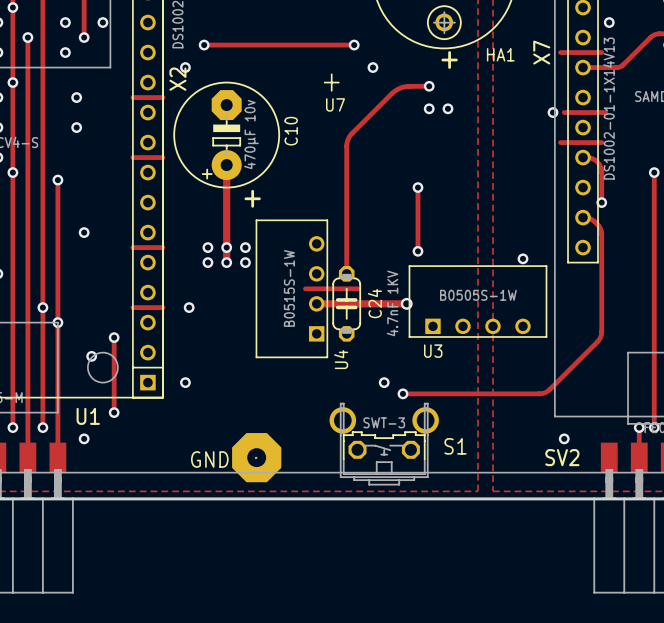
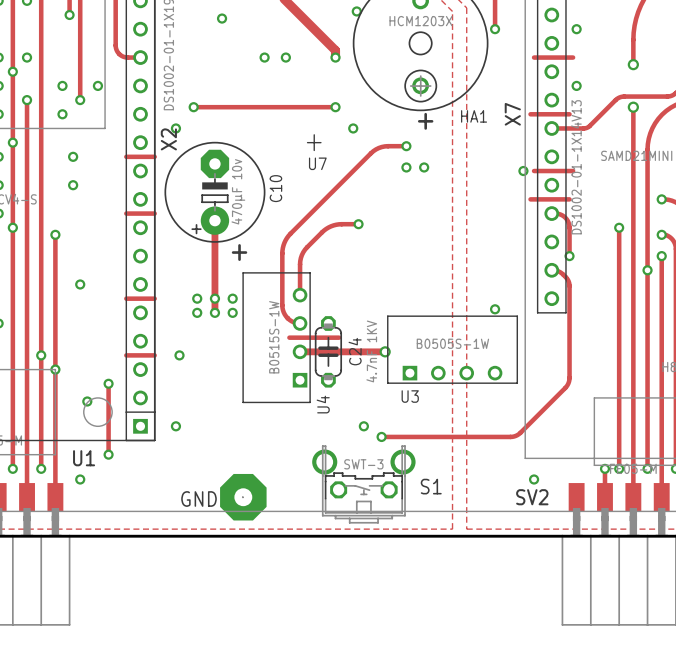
track: (352, 133) (346, 146) (346, 273) -> (333, 190) (290, 233) (283, 245) (282, 310) (289, 319) (300, 323)
track: none -> (358, 224) (339, 224) (328, 227) (305, 249) (300, 261) (300, 295)
track: (417, 187) (417, 251) -> none
via position: (417, 187) -> (358, 224)
via: (417, 251) -> none

